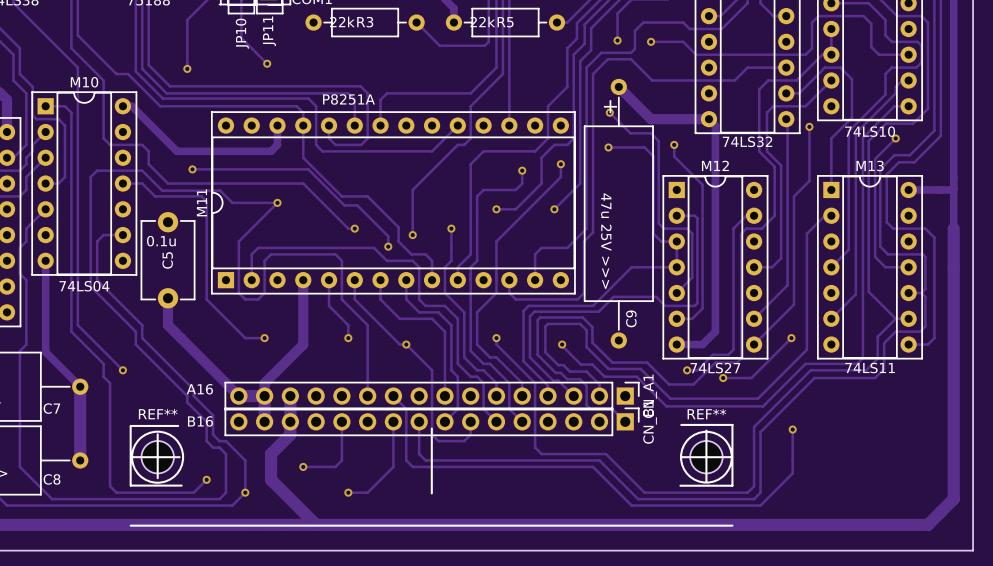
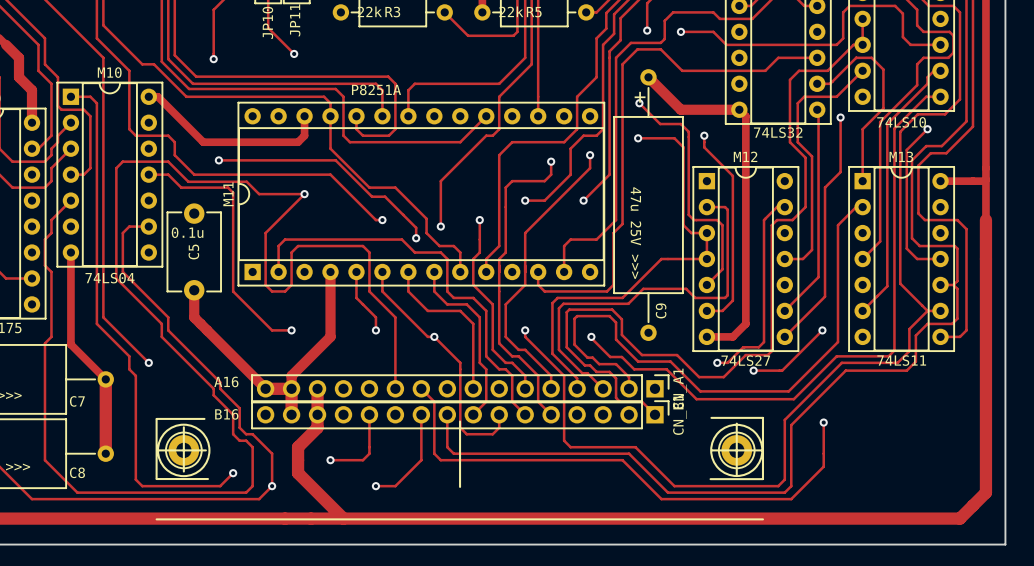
REF**: (157, 457) -> none
part: none -> (183, 450)
REF**: (706, 457) -> none
part: none -> (736, 450)

